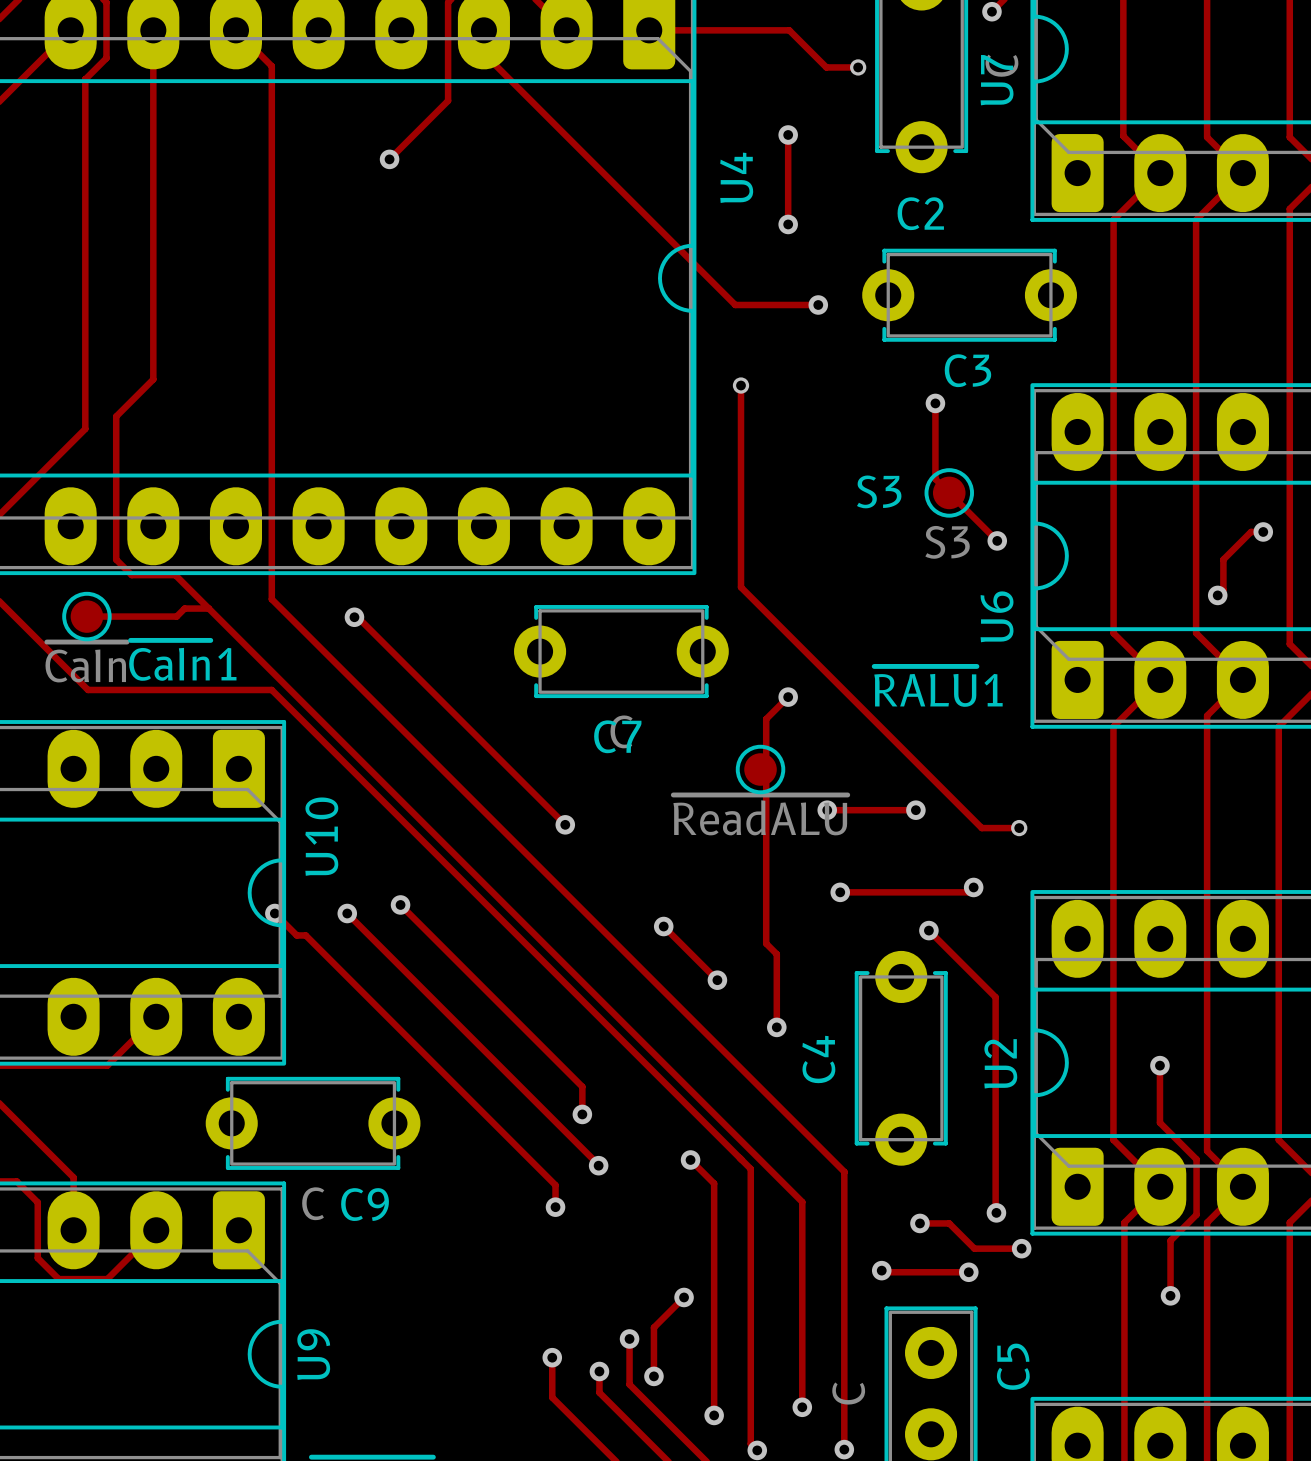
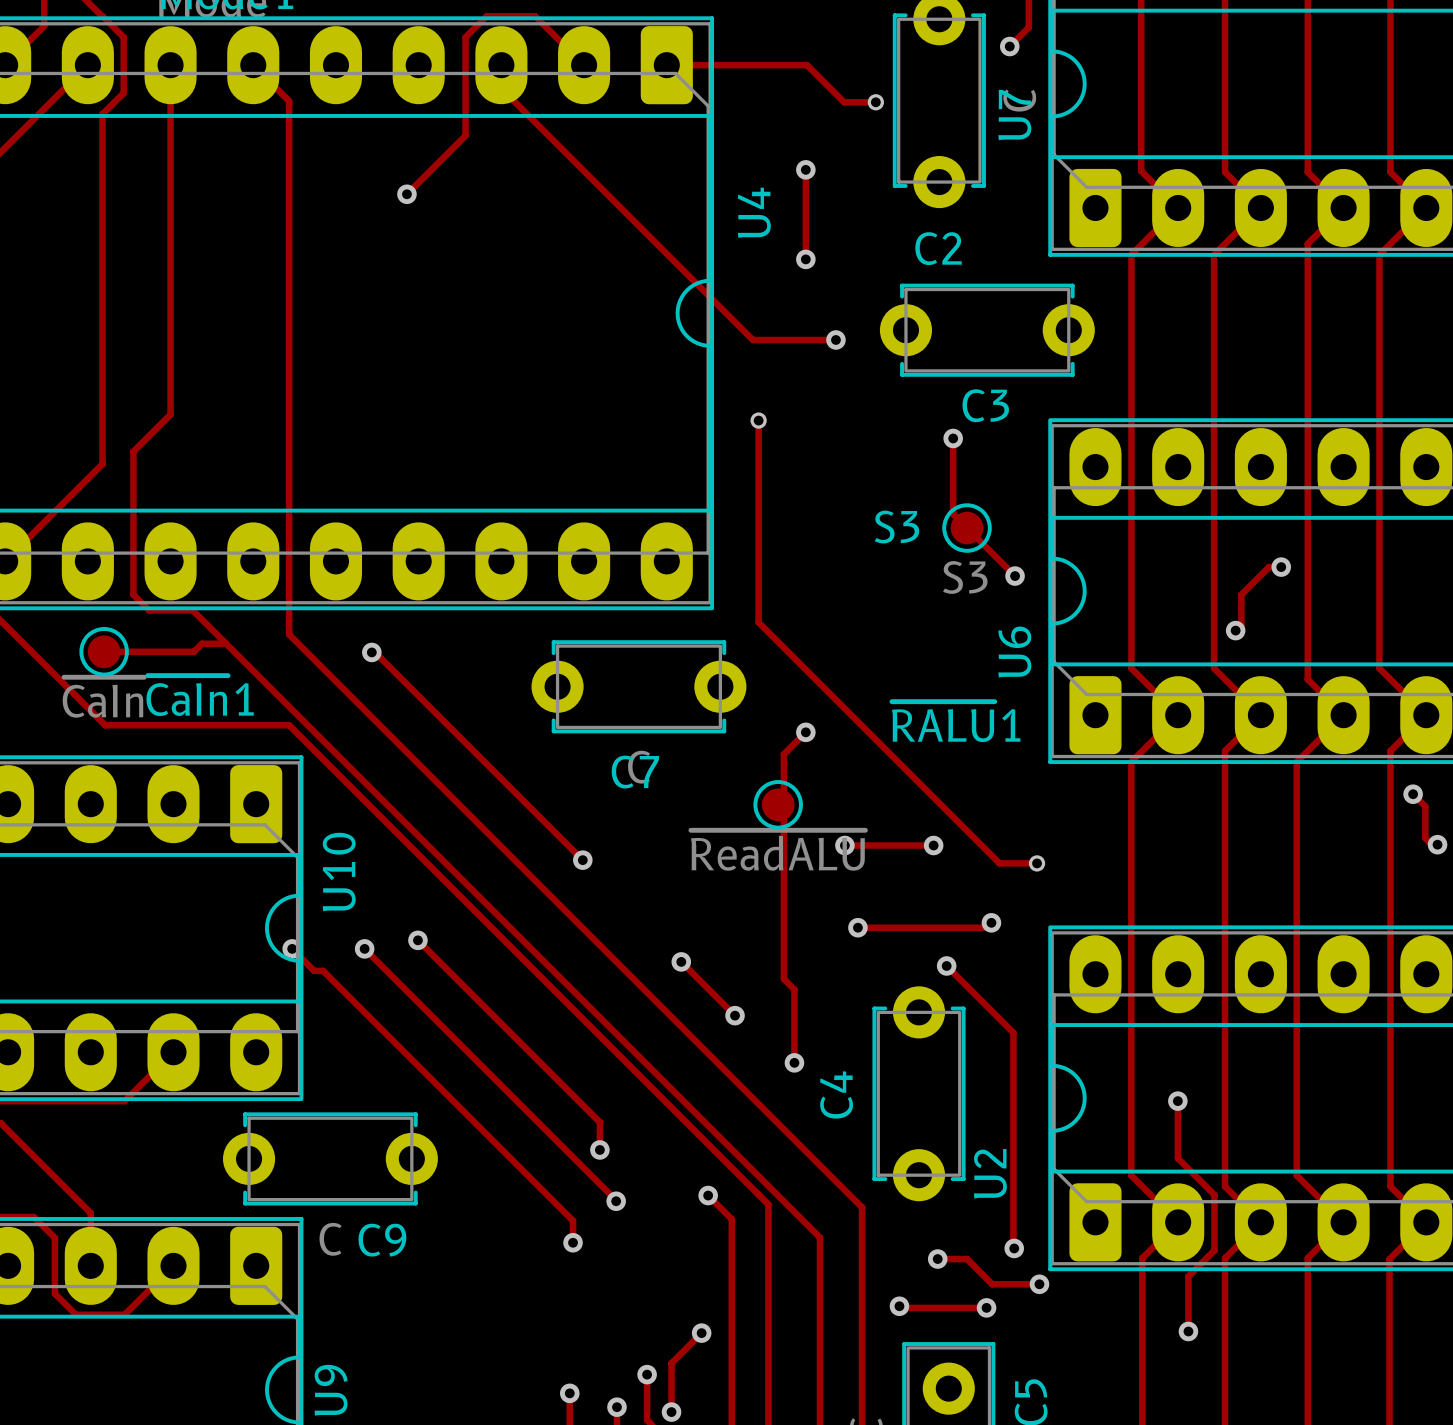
U2 name position: U2 (1000, 1063) -> U2 (990, 1173)

